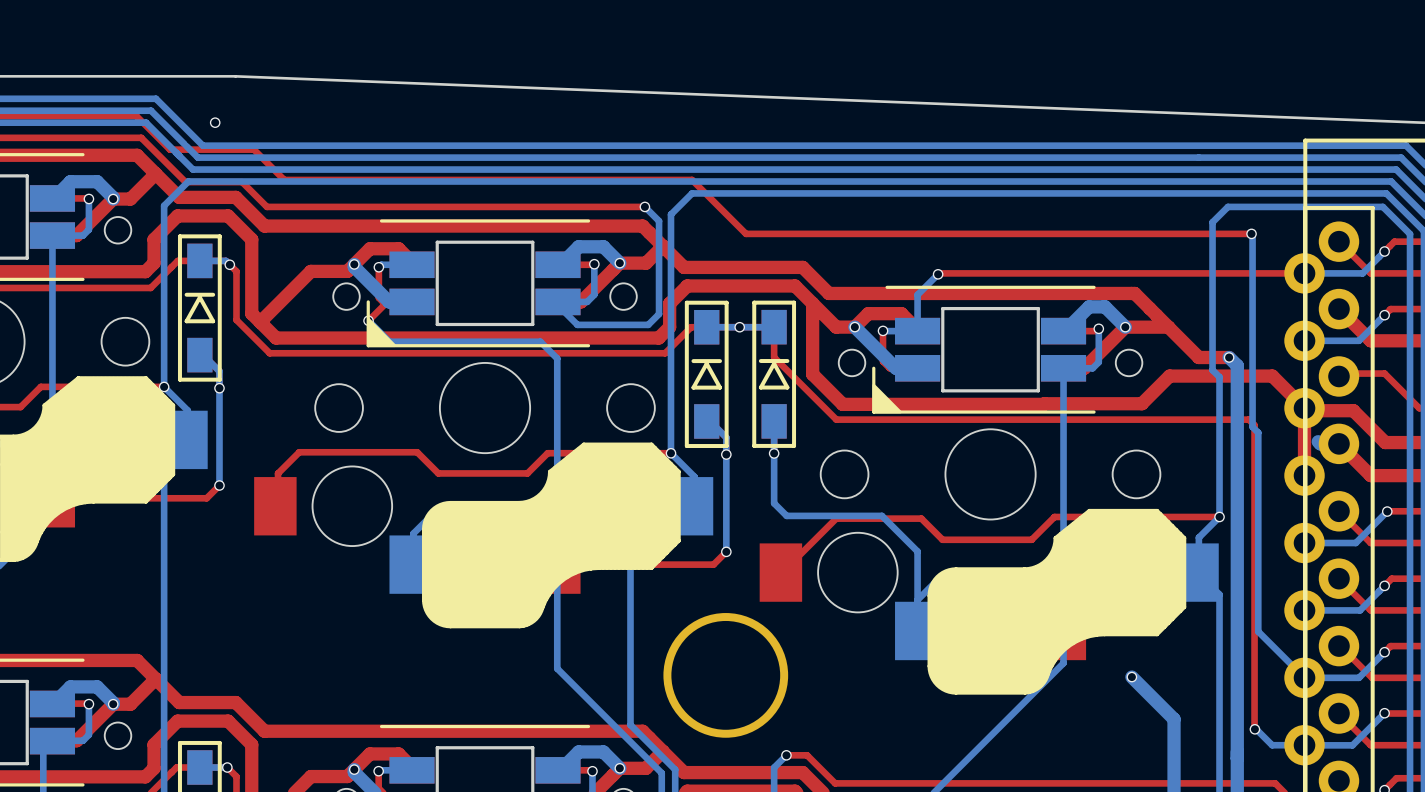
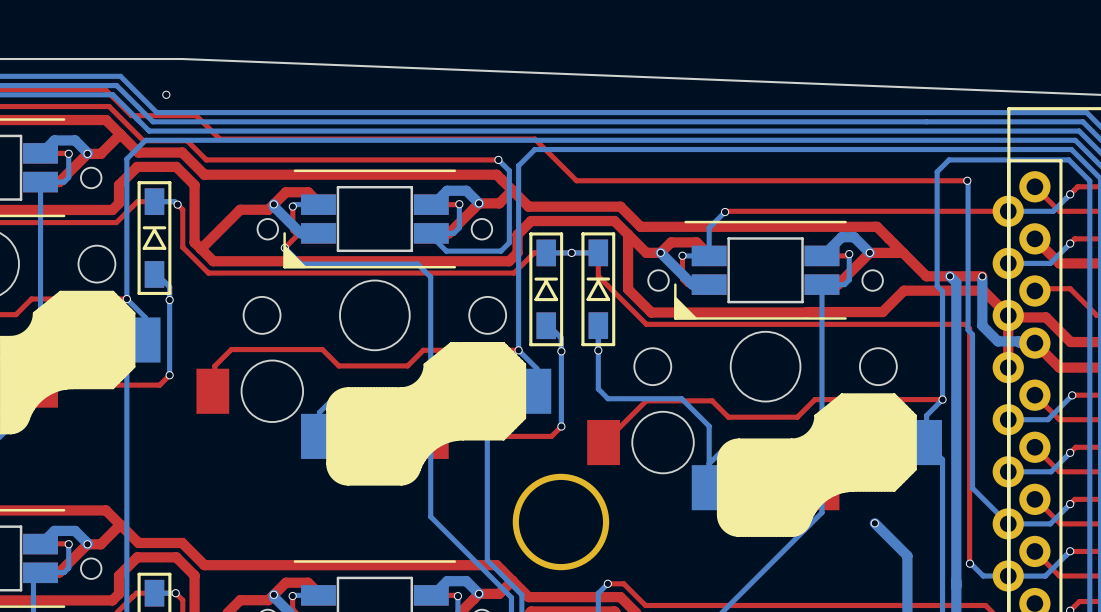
top track: none -> (982, 276) (949, 276)
via: none -> (982, 276)
bottom track: none -> (982, 278) (982, 325) (997, 341) (1018, 341)

